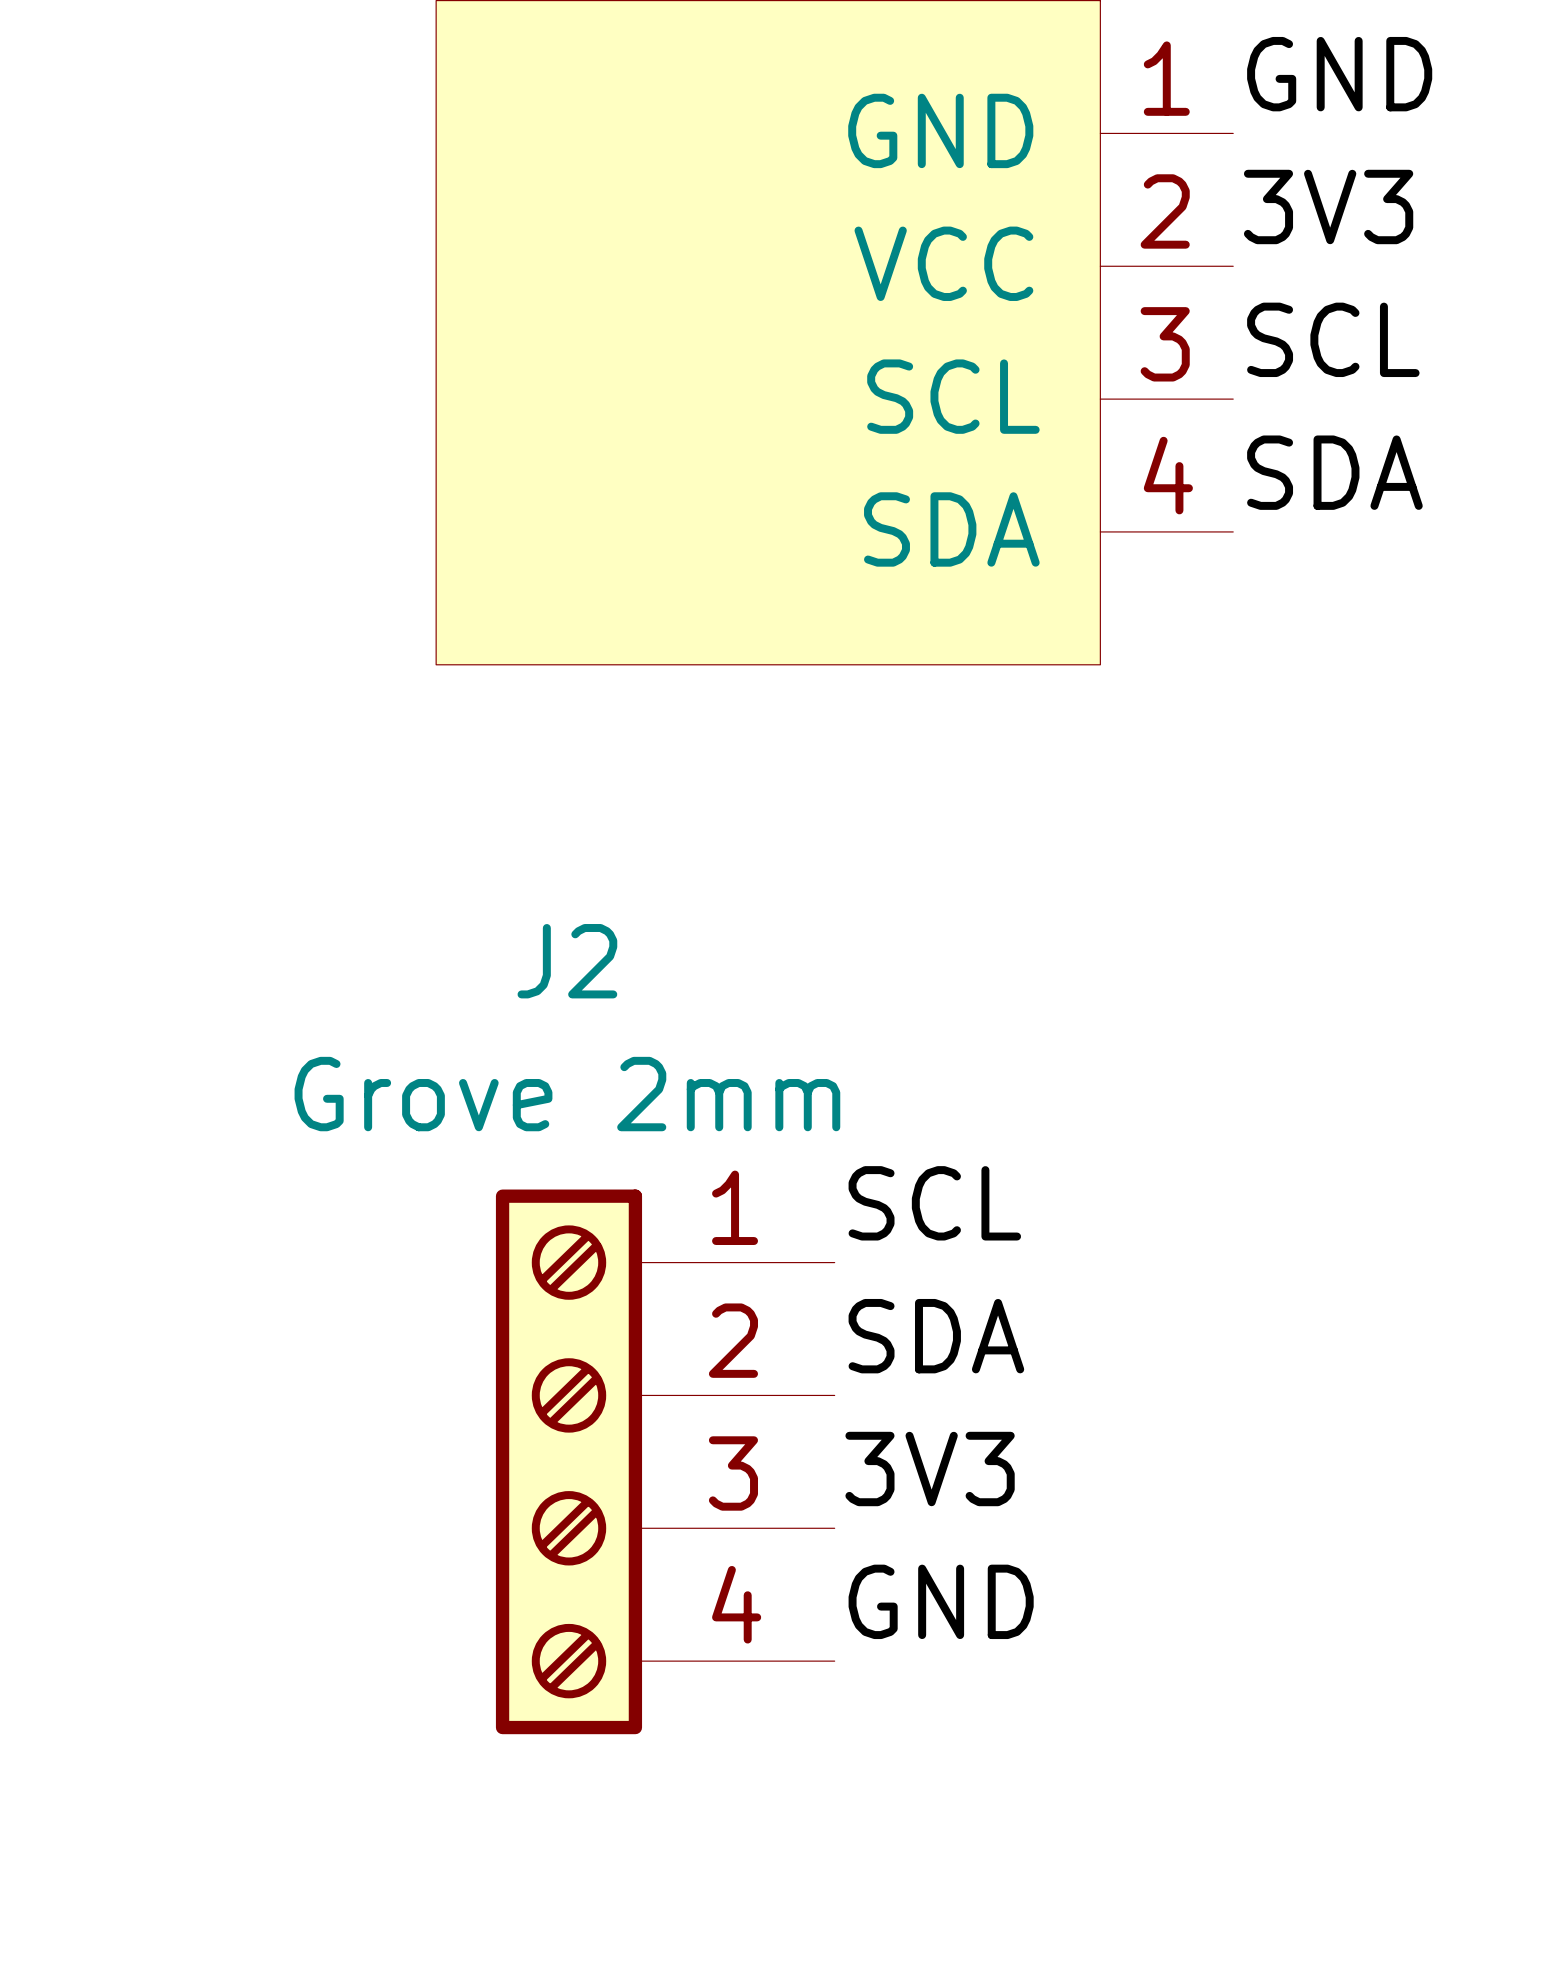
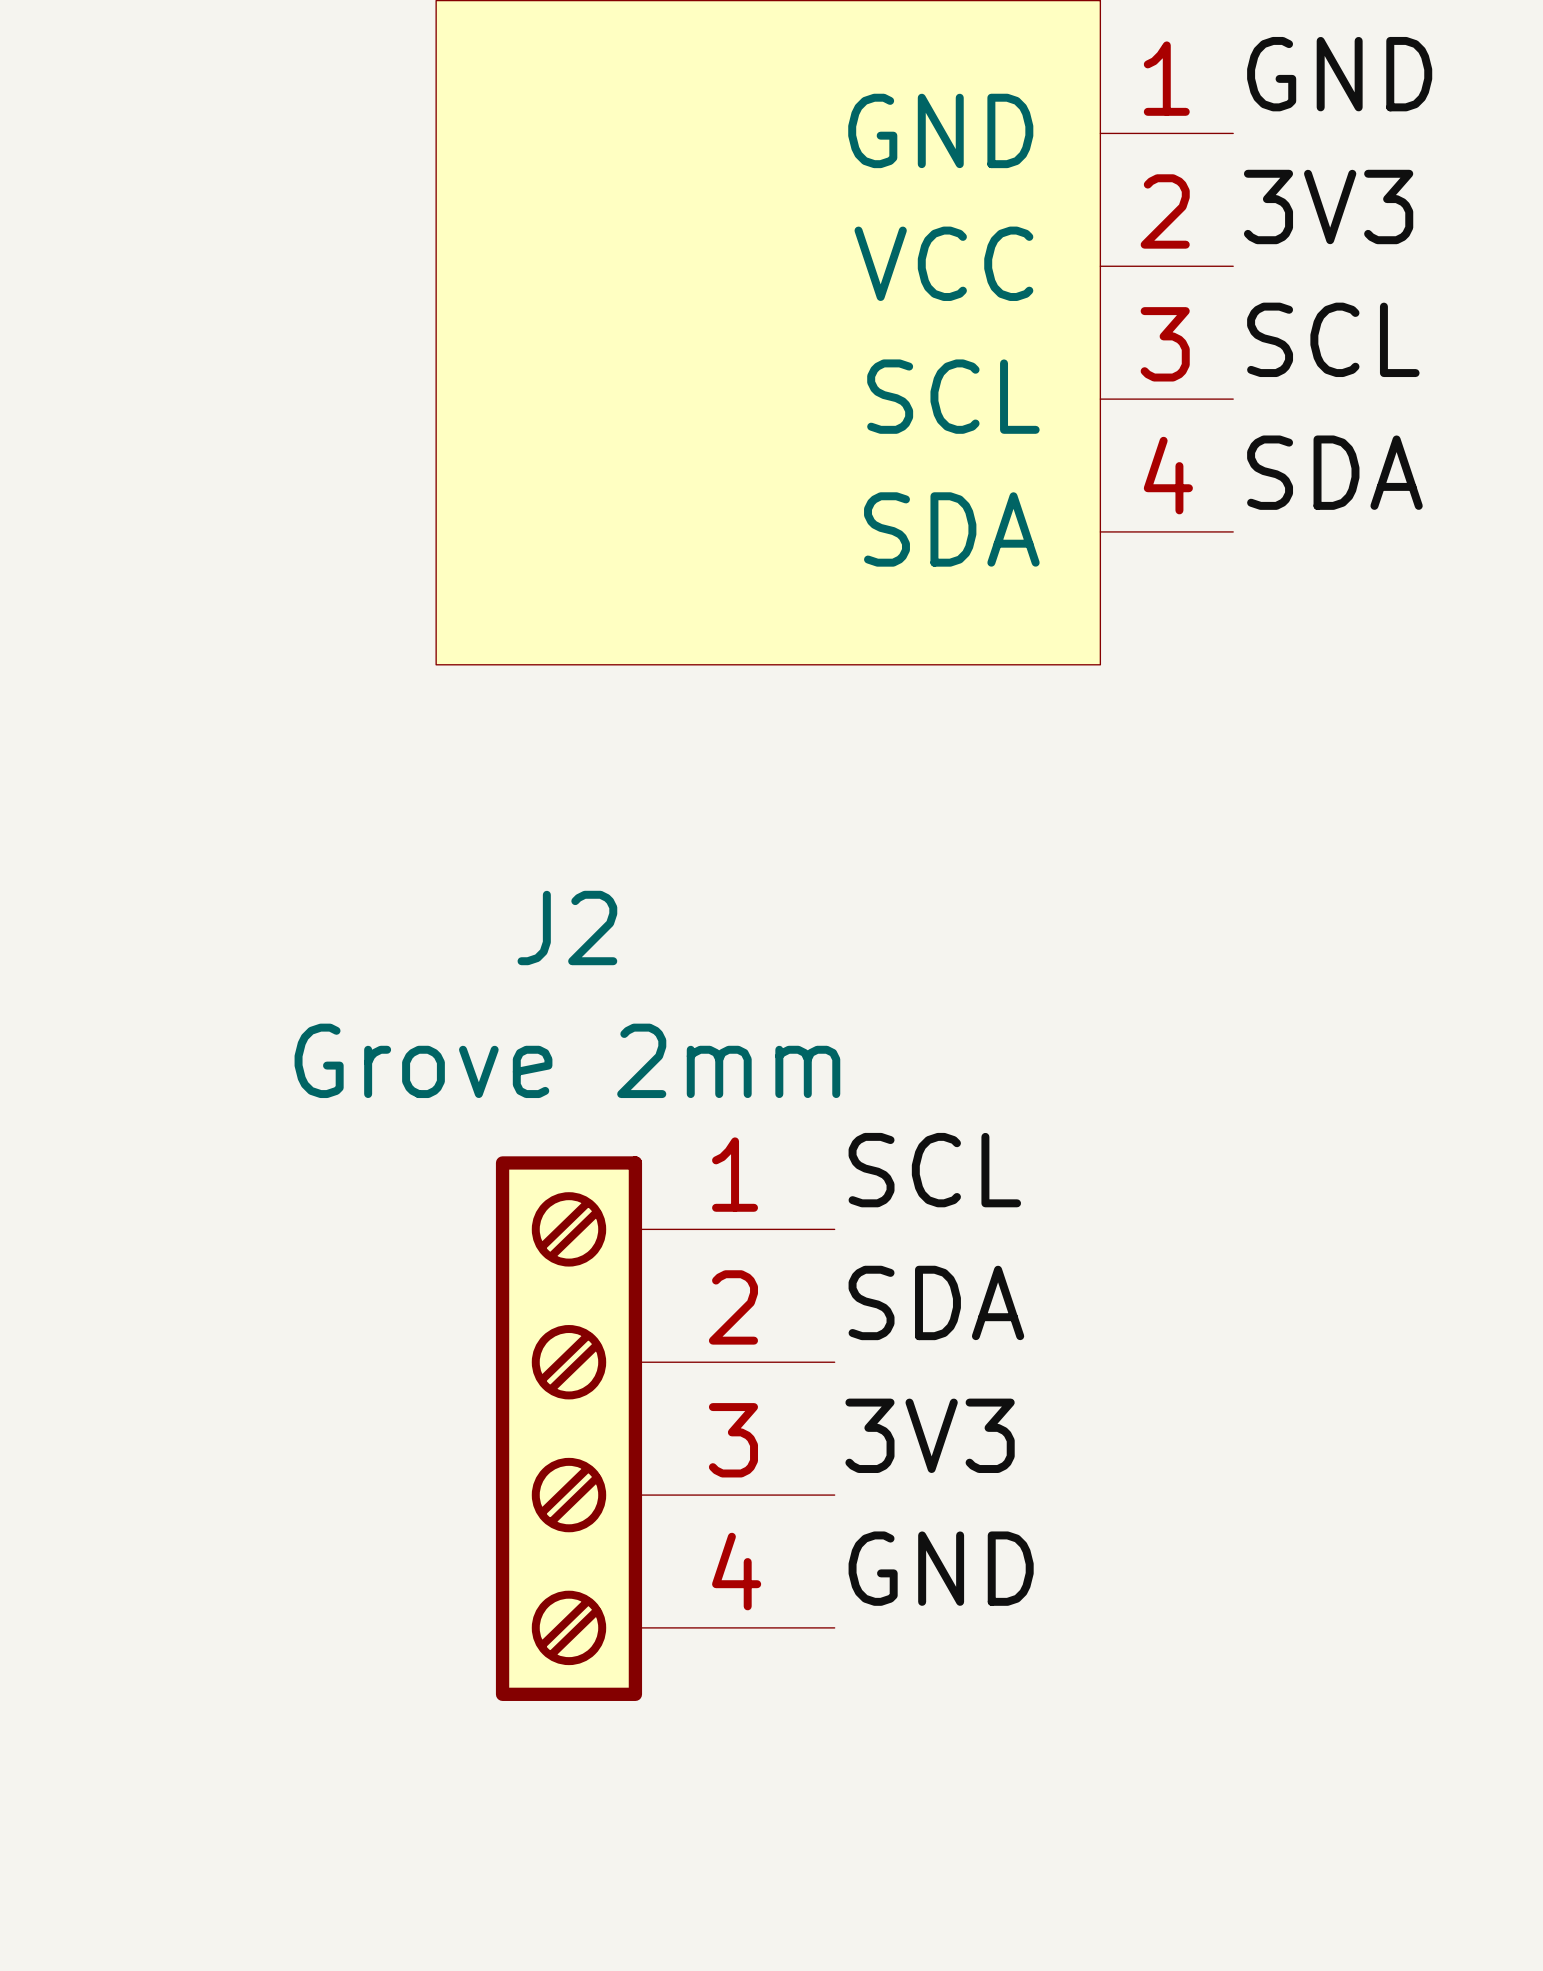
label position: SCL (934, 1203) -> SCL (934, 1170)
label position: SDA (936, 1336) -> SDA (936, 1302)
J2 position: (665, 1461) -> (665, 1428)
label position: 3V3 (930, 1469) -> 3V3 (930, 1435)
label position: GND (941, 1601) -> GND (941, 1568)

